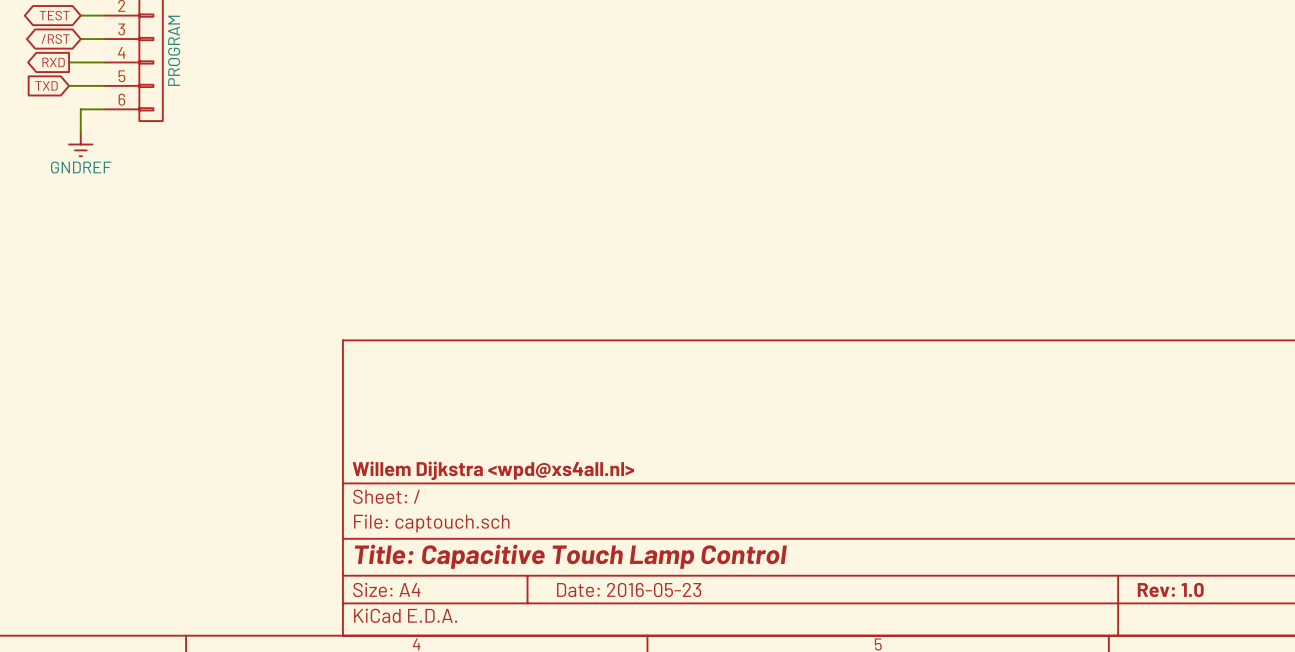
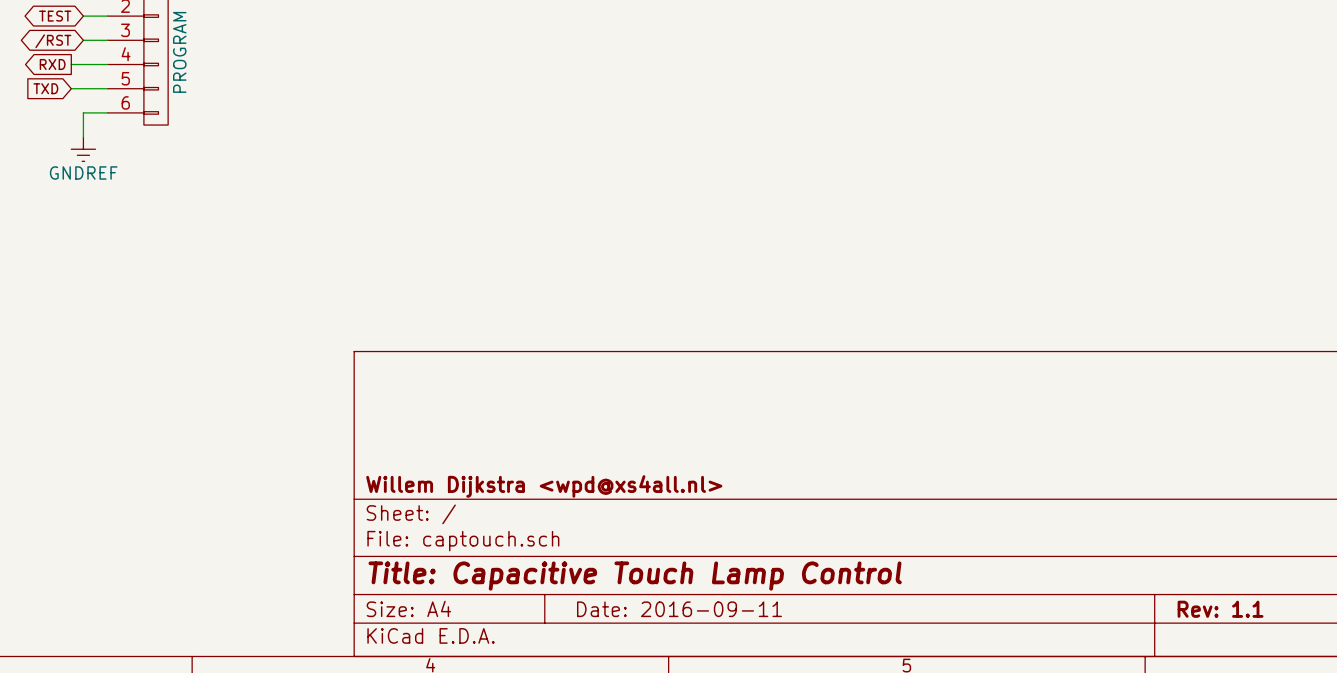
title block: Date: 2016-05-23 (629, 589) -> Date: 2016-09-11 (679, 609)
title block: Rev: 1.0 (1170, 589) -> Rev: 1.1 (1220, 609)

